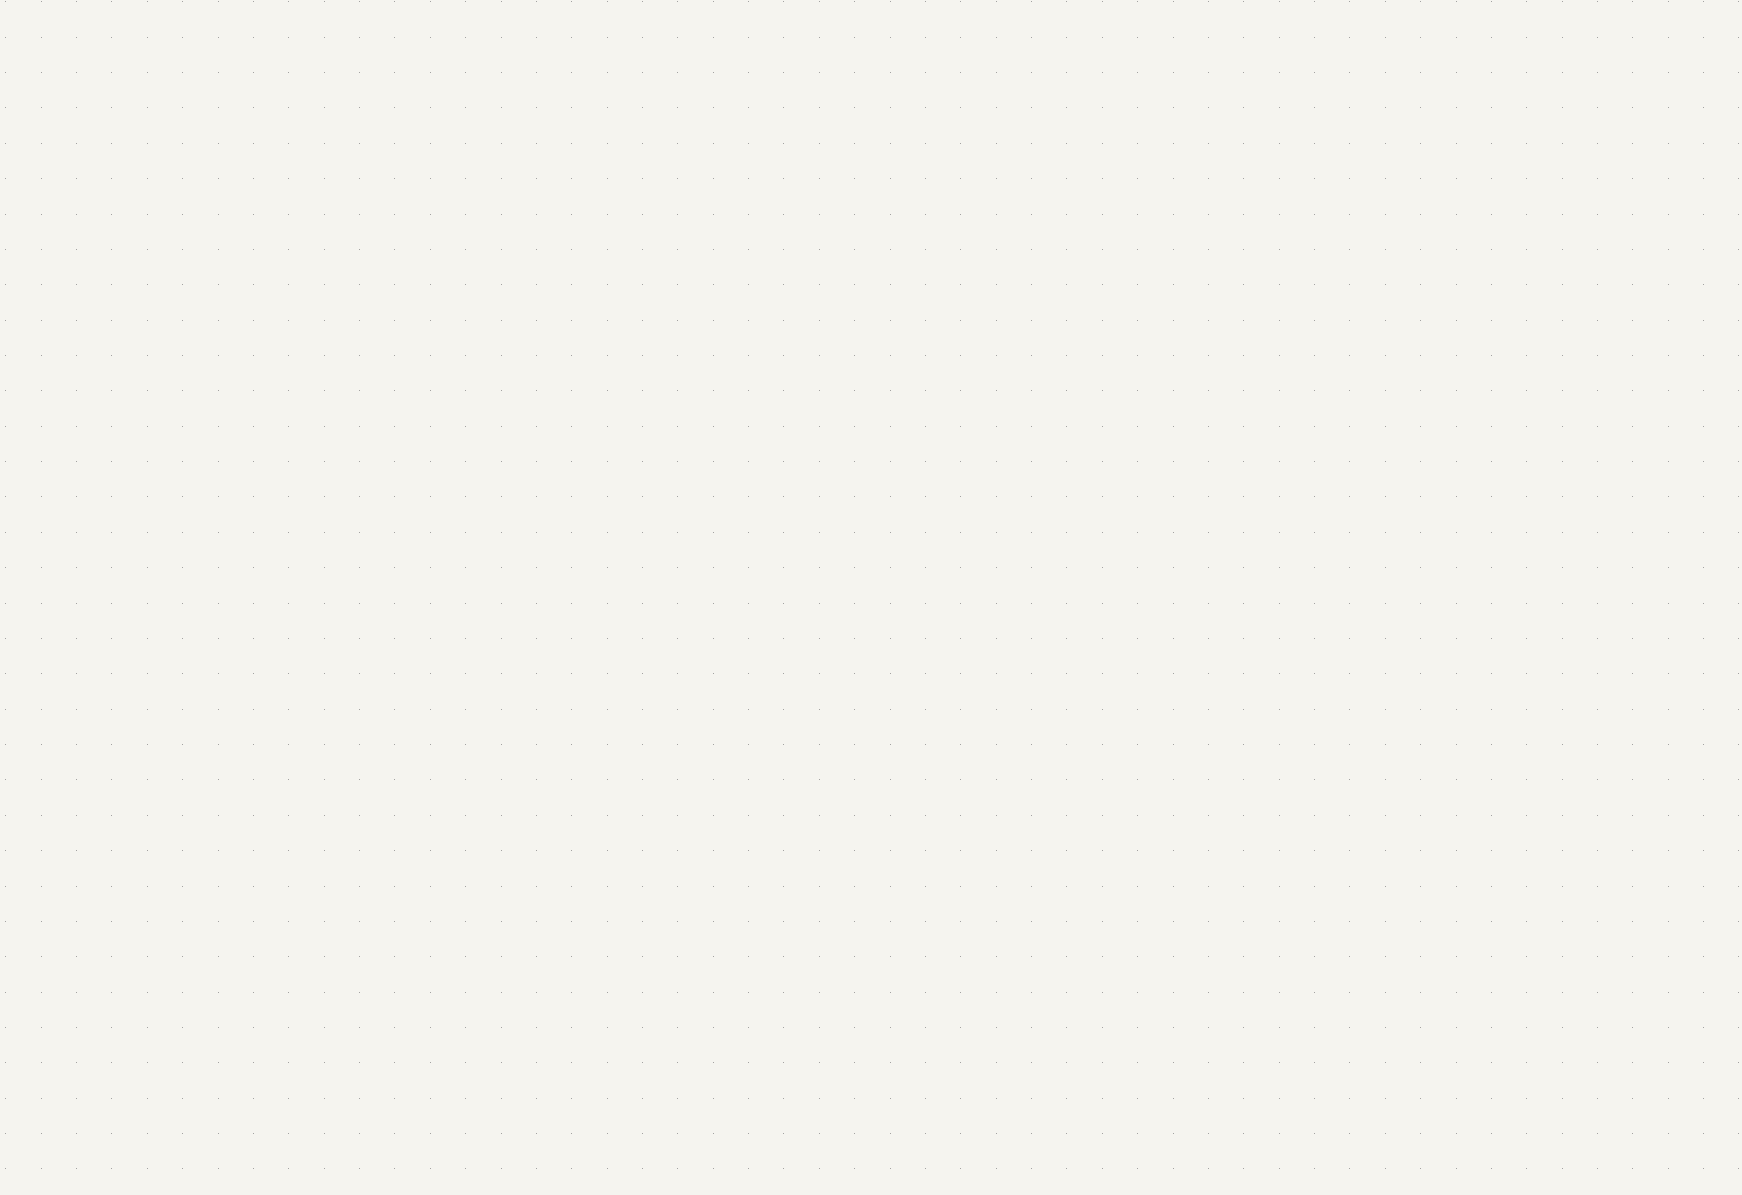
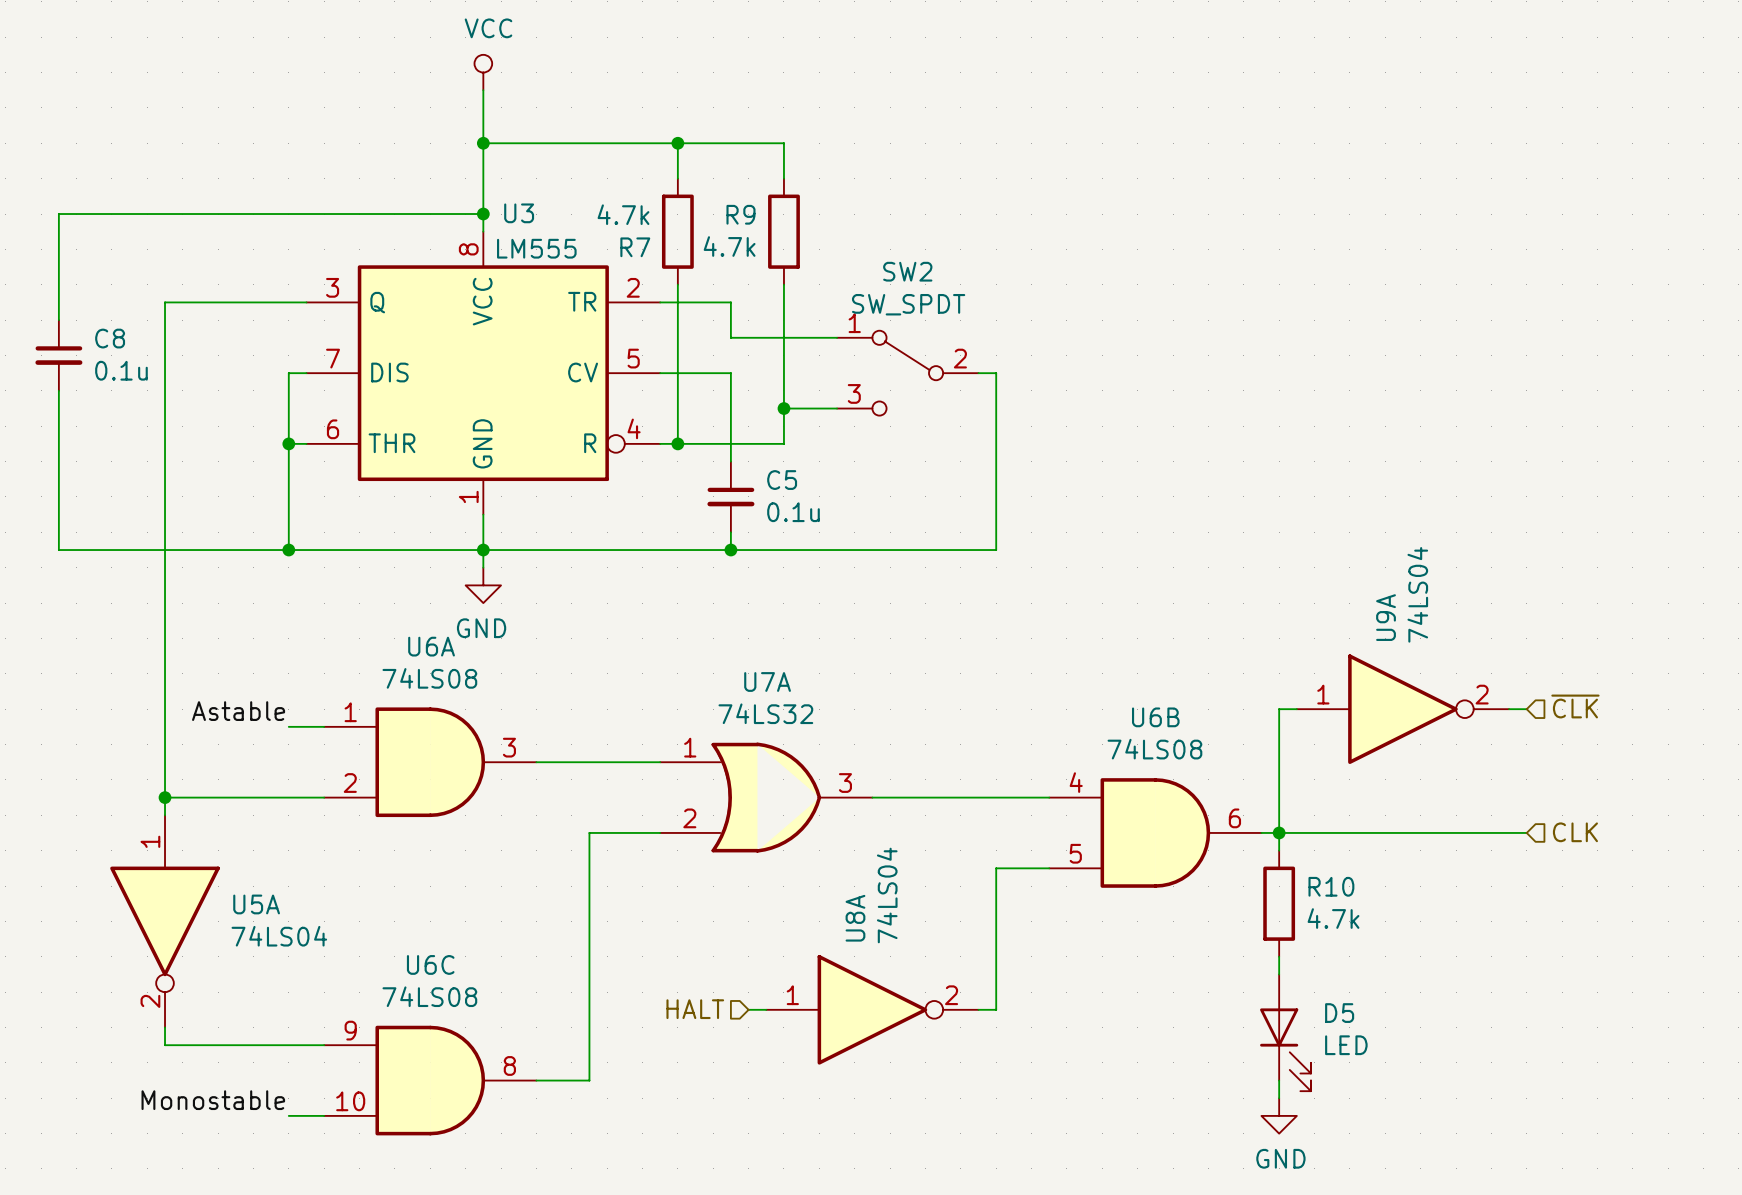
power symbol: none -> VCC (483, 72)
wire: none -> (483, 90) (483, 231)
wire: none -> (483, 143) (783, 143) (783, 178)
junction: none -> (483, 143)
wire: none -> (677, 143) (677, 178)
junction: none -> (677, 143)
wire: none -> (483, 214) (58, 214) (58, 320)
junction: none -> (483, 214)
R7: none -> 4.7k (677, 231)
R9: none -> 4.7k (783, 231)
wire: none -> (677, 284) (677, 443)
wire: none -> (783, 284) (783, 443) (660, 443)
wire: none -> (306, 302) (165, 302) (165, 815)
wire: none -> (660, 302) (730, 302) (730, 337) (837, 337)
C8: none -> 0.1u (58, 355)
wire: none -> (306, 373) (288, 373) (288, 550)
U3: none -> LM555 (483, 373)
wire: none -> (660, 373) (730, 373) (730, 461)
SW2: none -> SW_SPDT (907, 373)
wire: none -> (978, 373) (996, 373) (996, 550) (58, 550) (58, 390)
wire: none -> (783, 408) (837, 408)
junction: none -> (783, 408)
wire: none -> (288, 443) (306, 443)
junction: none -> (288, 443)
junction: none -> (677, 443)
C5: none -> 0.1u (730, 496)
wire: none -> (483, 514) (483, 567)
wire: none -> (730, 532) (730, 550)
junction: none -> (288, 550)
junction: none -> (483, 550)
junction: none -> (730, 550)
power symbol: none -> GND (483, 585)
hierarchical label: none -> ~{CLK} (1575, 706)
wire: none -> (1296, 709) (1279, 709) (1279, 850)
U9A: none -> 74LS04 (1402, 709)
wire: none -> (1509, 709) (1526, 709)
label: none -> Astable (238, 711)
wire: none -> (288, 726) (324, 726)
U6A: none -> 74LS08 (430, 762)
wire: none -> (536, 762) (660, 762)
wire: none -> (165, 797) (324, 797)
junction: none -> (165, 797)
U7A: none -> 74LS32 (766, 797)
wire: none -> (872, 797) (1049, 797)
wire: none -> (660, 832) (589, 832) (589, 1080) (536, 1080)
U6B: none -> 74LS08 (1155, 832)
wire: none -> (1261, 832) (1526, 832)
junction: none -> (1279, 832)
hierarchical label: none -> CLK (1575, 832)
wire: none -> (1049, 868) (996, 868) (996, 1009) (978, 1009)
R10: none -> 4.7k (1279, 903)
U5A: none -> 74LS04 (165, 921)
wire: none -> (1279, 956) (1279, 974)
hierarchical label: none -> HALT (695, 1009)
wire: none -> (748, 1009) (766, 1009)
U8A: none -> 74LS04 (872, 1009)
wire: none -> (165, 1027) (165, 1045) (324, 1045)
D5: none -> LED (1285, 1032)
U6C: none -> 74LS08 (430, 1080)
wire: none -> (1279, 1080) (1279, 1098)
label: none -> Monostable (213, 1100)
wire: none -> (288, 1115) (324, 1115)
power symbol: none -> GND (1279, 1115)

